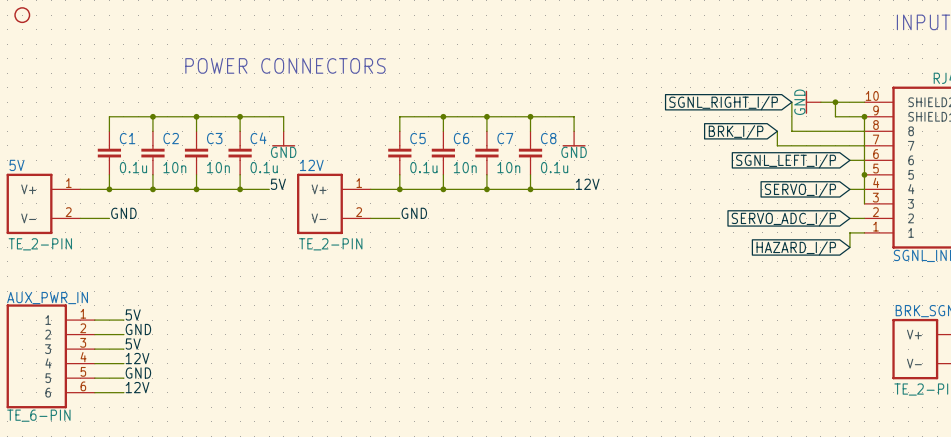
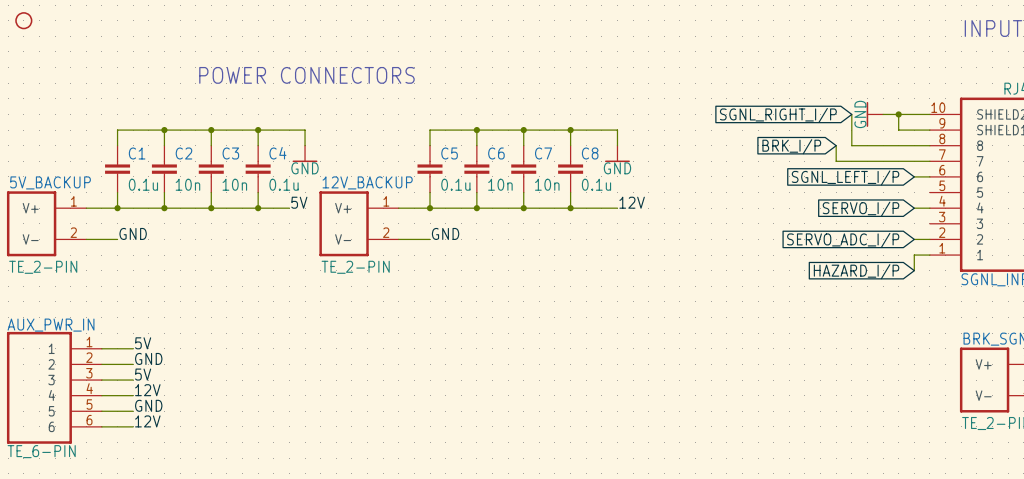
wire: (864, 116) (864, 203) -> none
junction: (864, 116) -> none
5V name: 5V (17, 165) -> 5V_BACKUP (50, 182)
12V name: 12V (311, 165) -> 12V_BACKUP (367, 182)
junction: (864, 174) -> none

